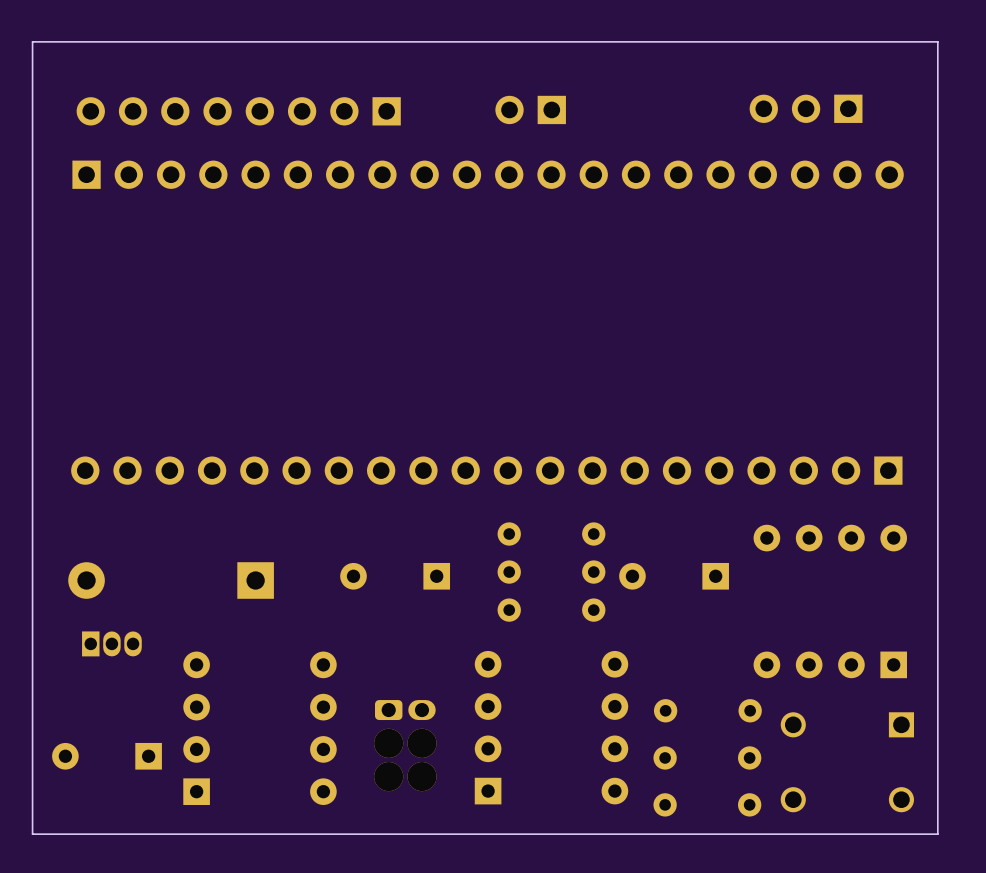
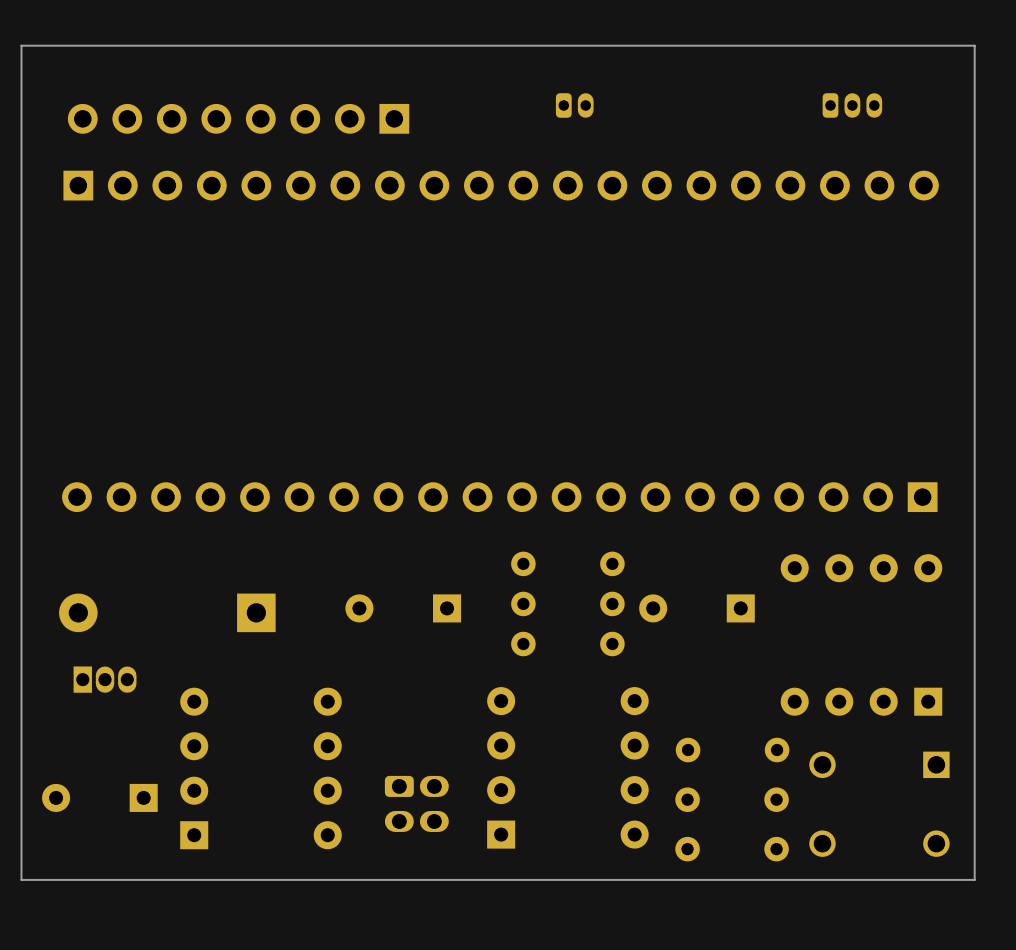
part: none -> (574, 105)
part: none -> (852, 105)
part: (806, 108) -> none
part: (530, 109) -> none
part footprint: [374, 700, 437, 792] -> [384, 775, 449, 832]

